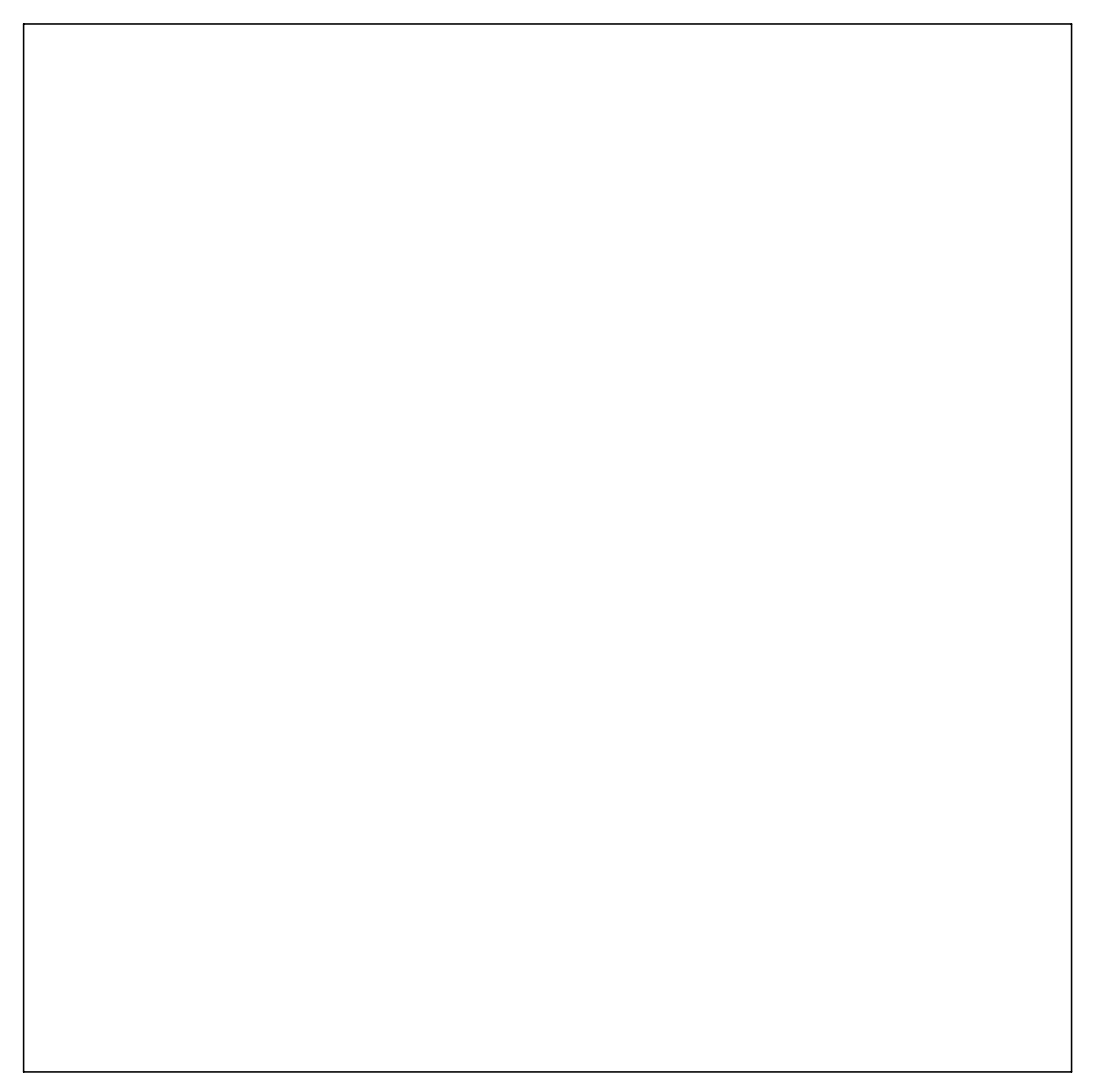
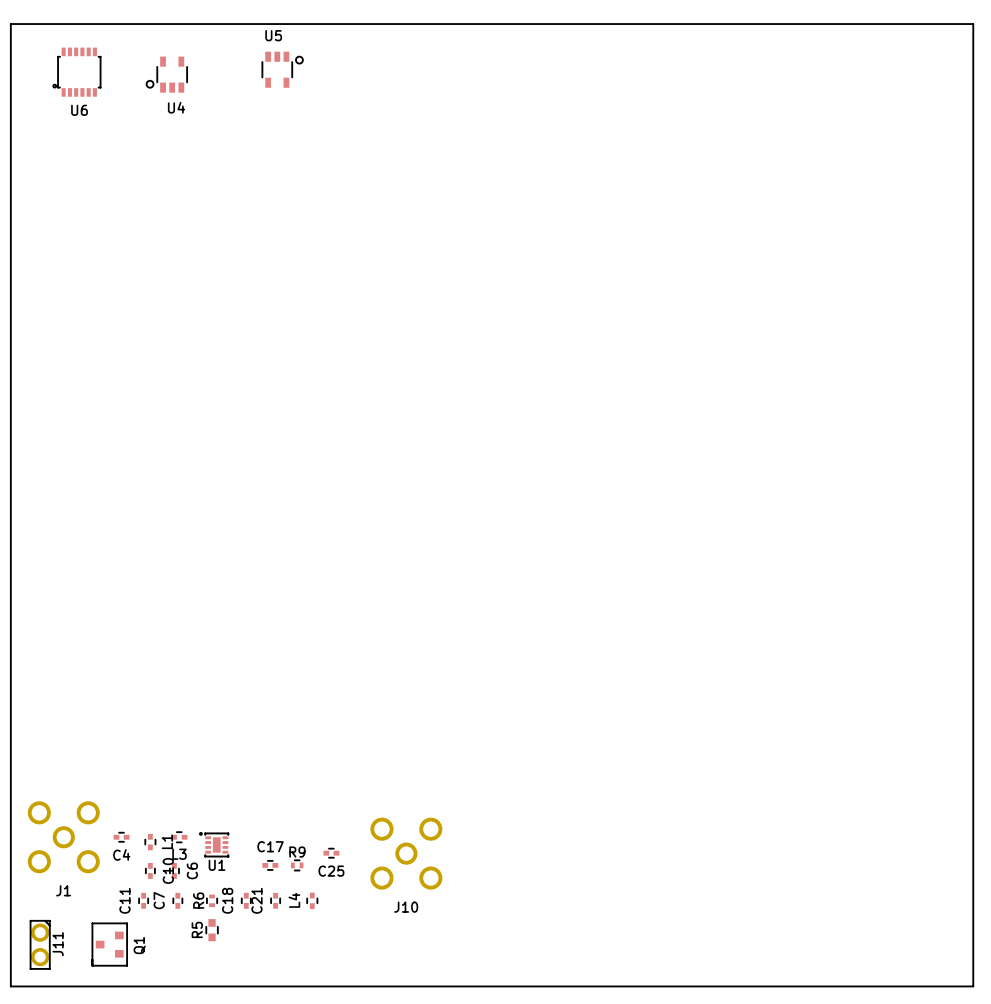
U5: none -> (282, 69)
U6: none -> (76, 72)
U4: none -> (166, 74)
J1: none -> (63, 837)
C4: none -> (121, 837)
L3: none -> (179, 837)
L1: none -> (150, 842)
U1: none -> (214, 844)
C25: none -> (331, 853)
J10: none -> (406, 853)
C17: none -> (270, 865)
R9: none -> (297, 865)
C10: none -> (150, 870)
C6: none -> (174, 870)
C11: none -> (143, 900)
C7: none -> (177, 900)
R6: none -> (212, 900)
C18: none -> (246, 900)
C21: none -> (275, 900)
L4: none -> (312, 900)
R5: none -> (212, 930)
J11: none -> (40, 944)
Q1: none -> (109, 944)

